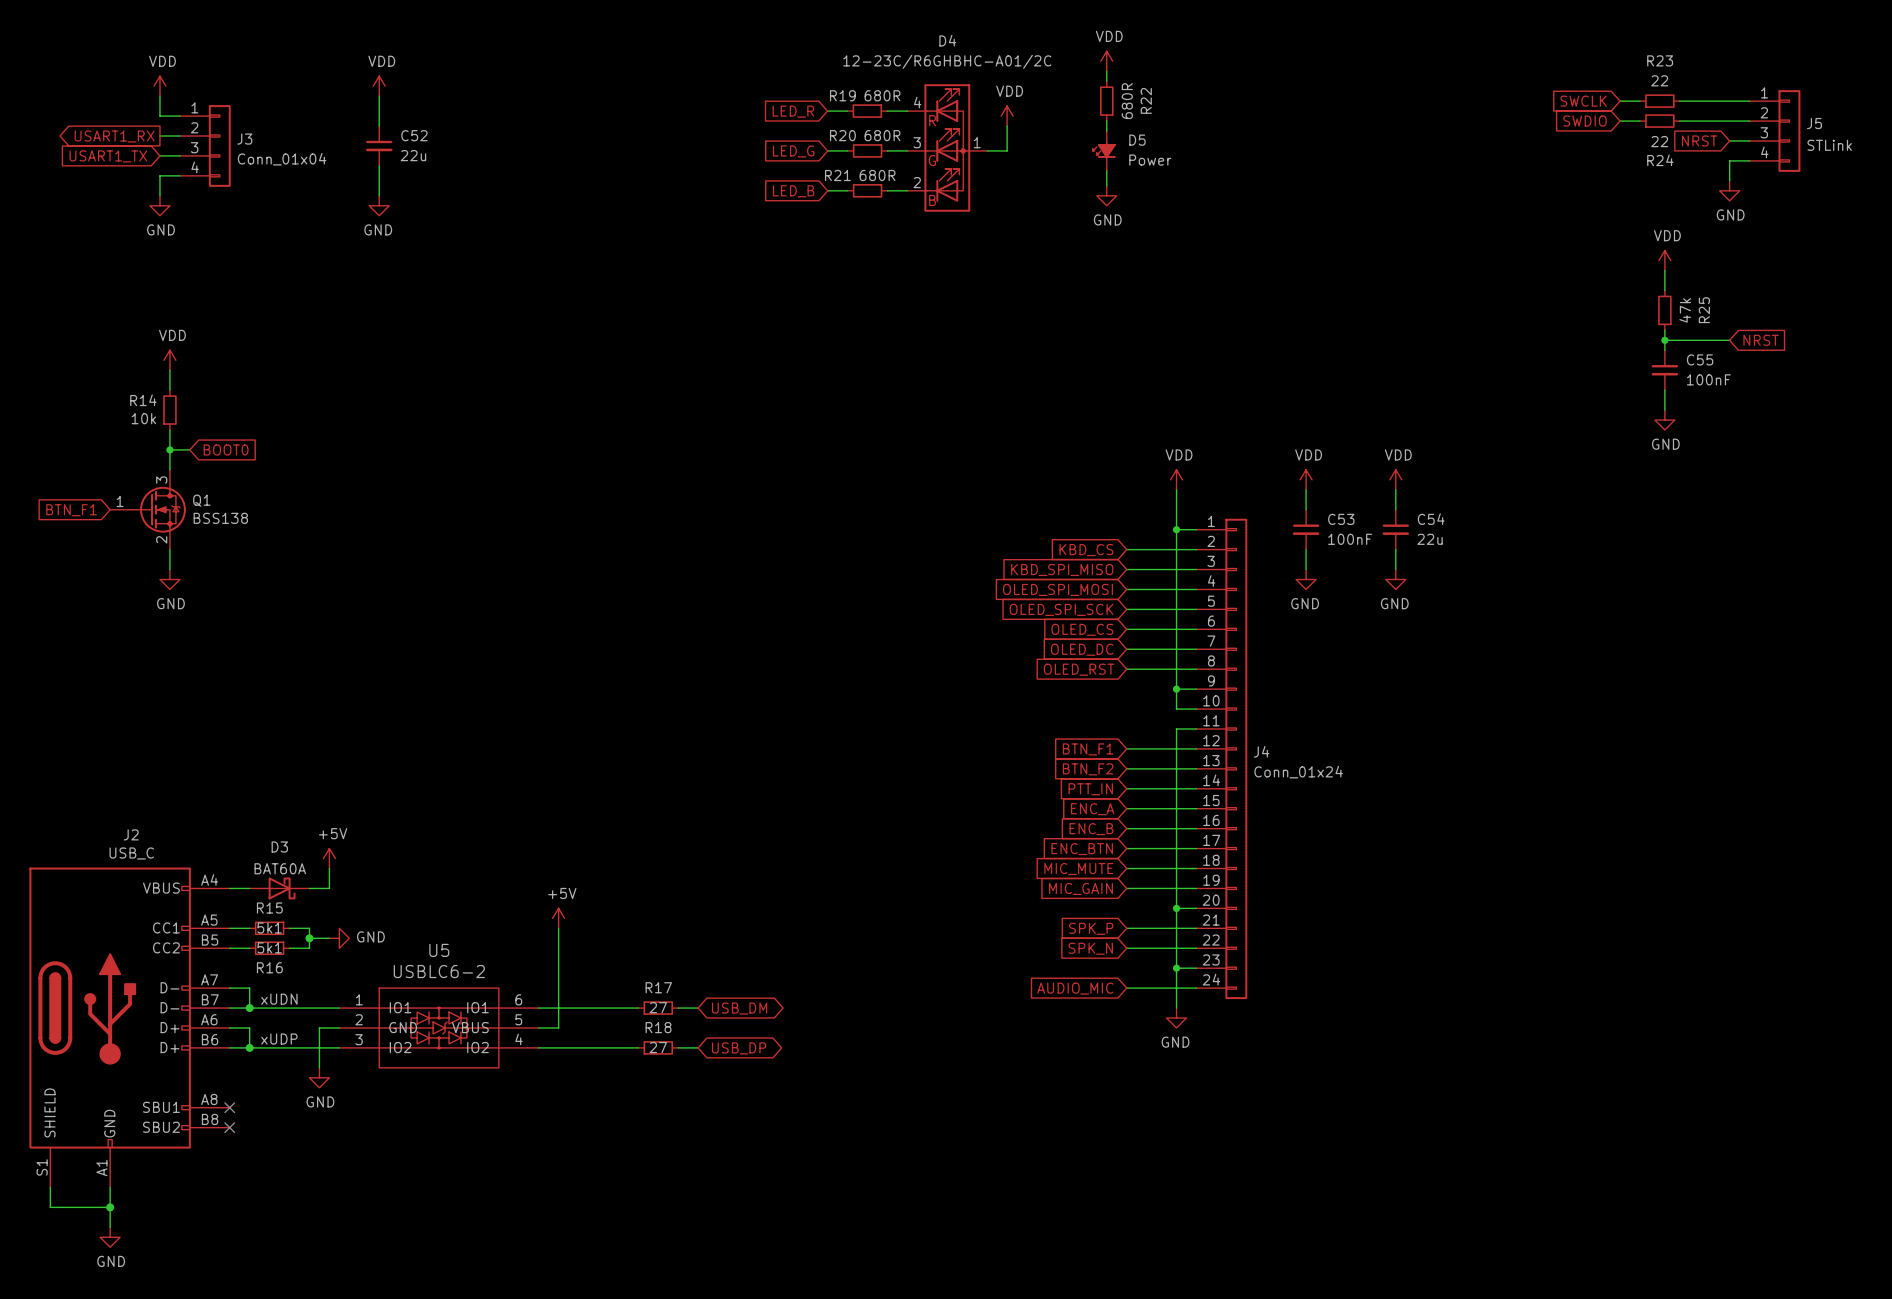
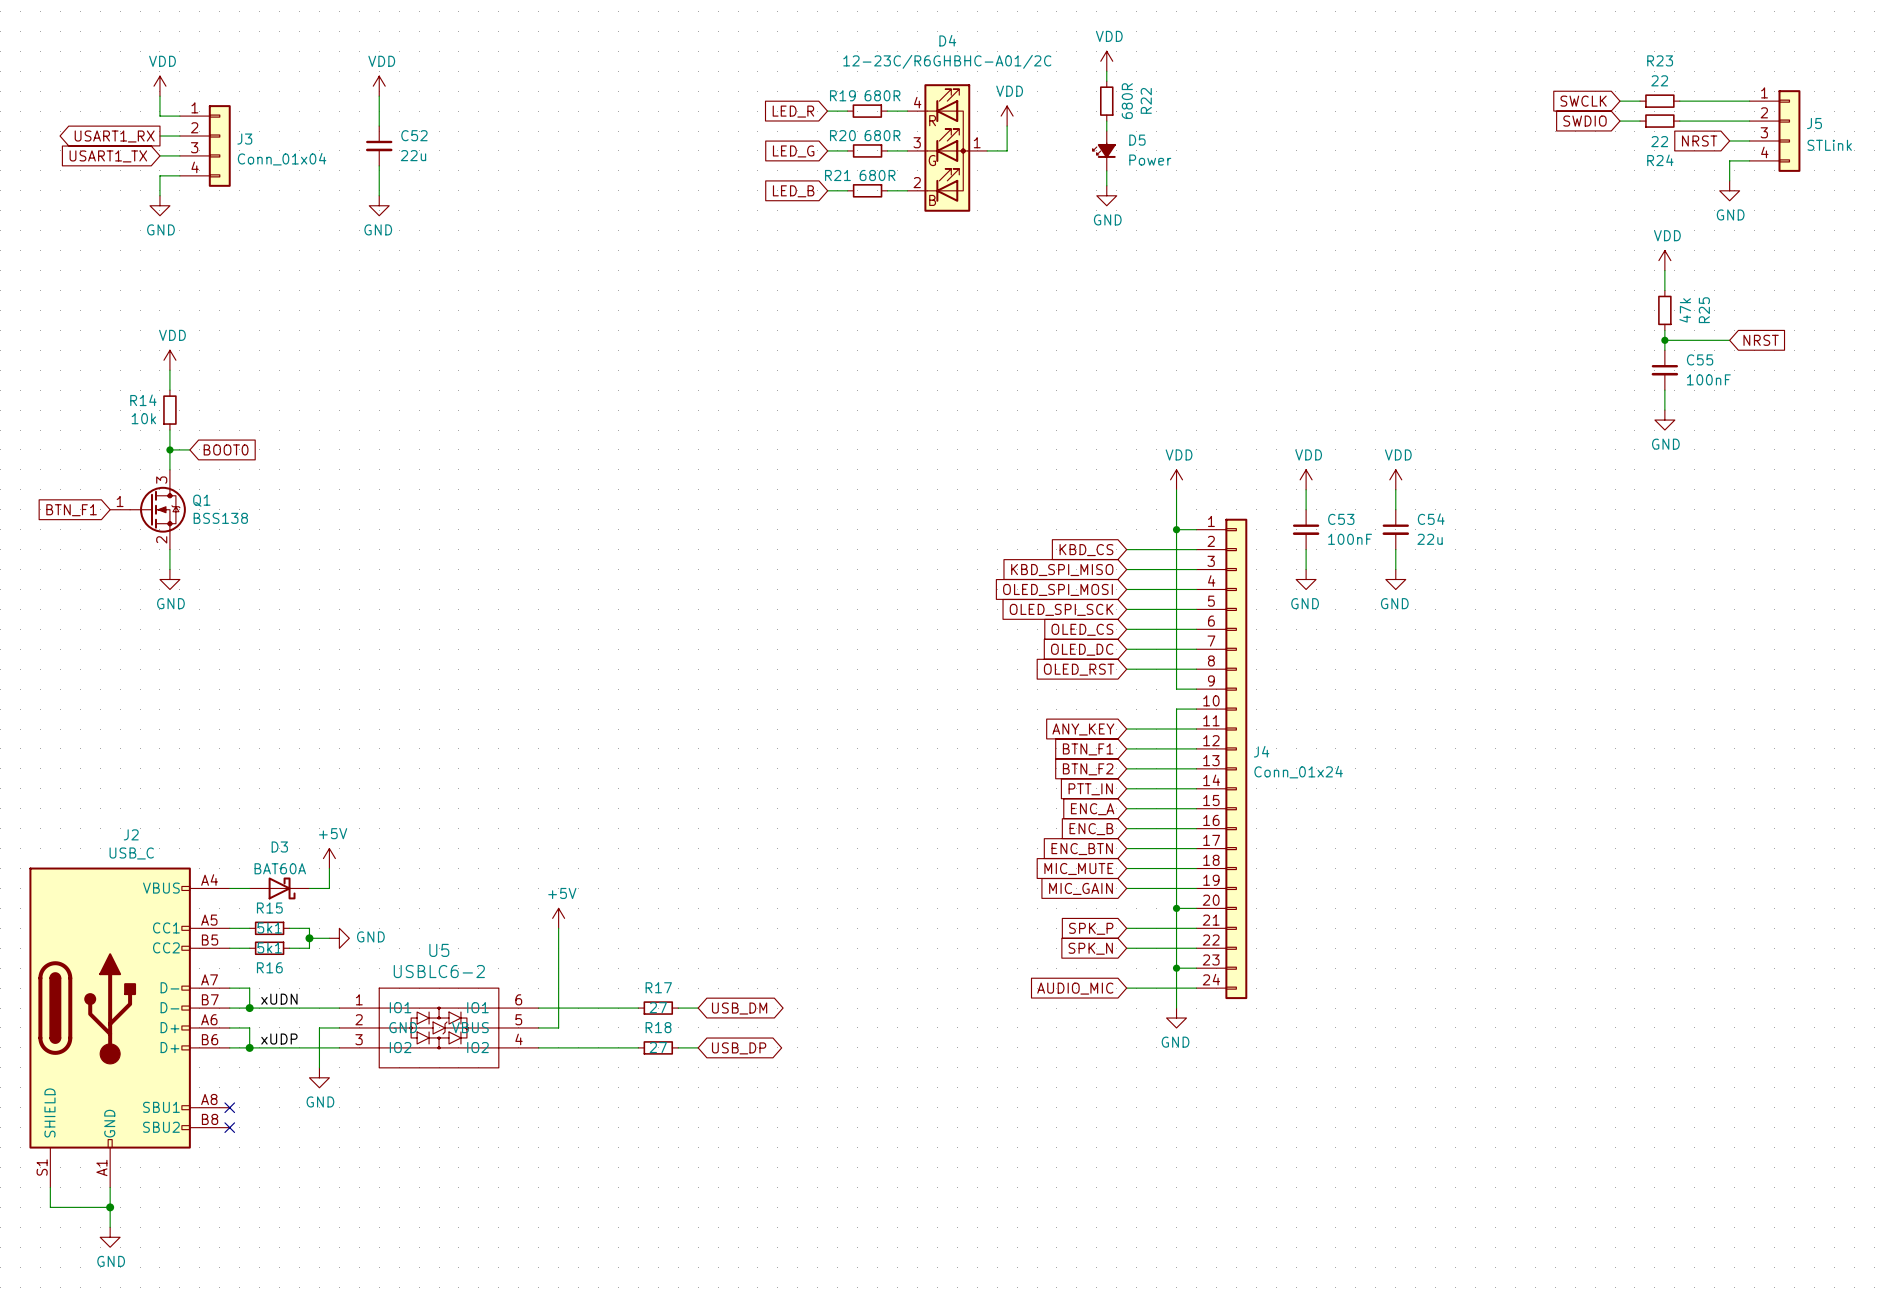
wire: (1176, 689) (1176, 709) -> (1126, 729) (1176, 729) (1176, 709)
junction: (1176, 689) -> none
global label: none -> ANY_KEY (1083, 729)

